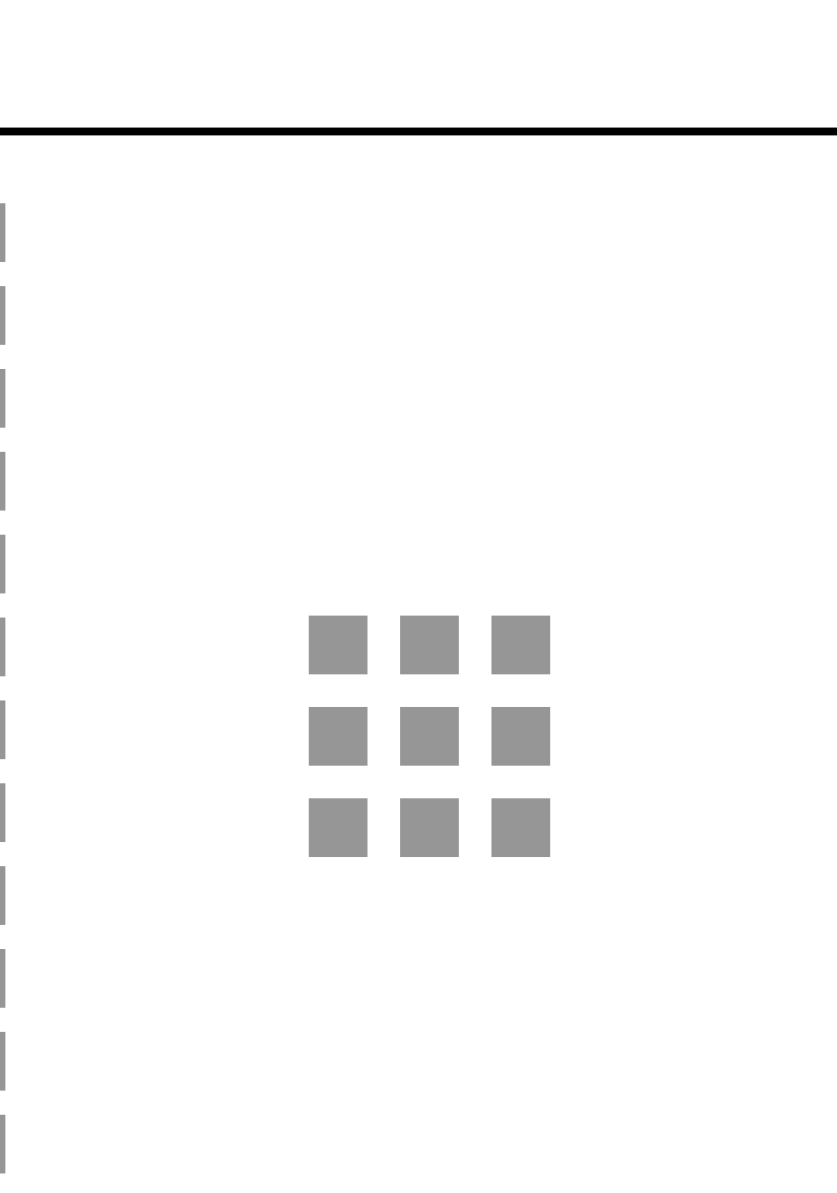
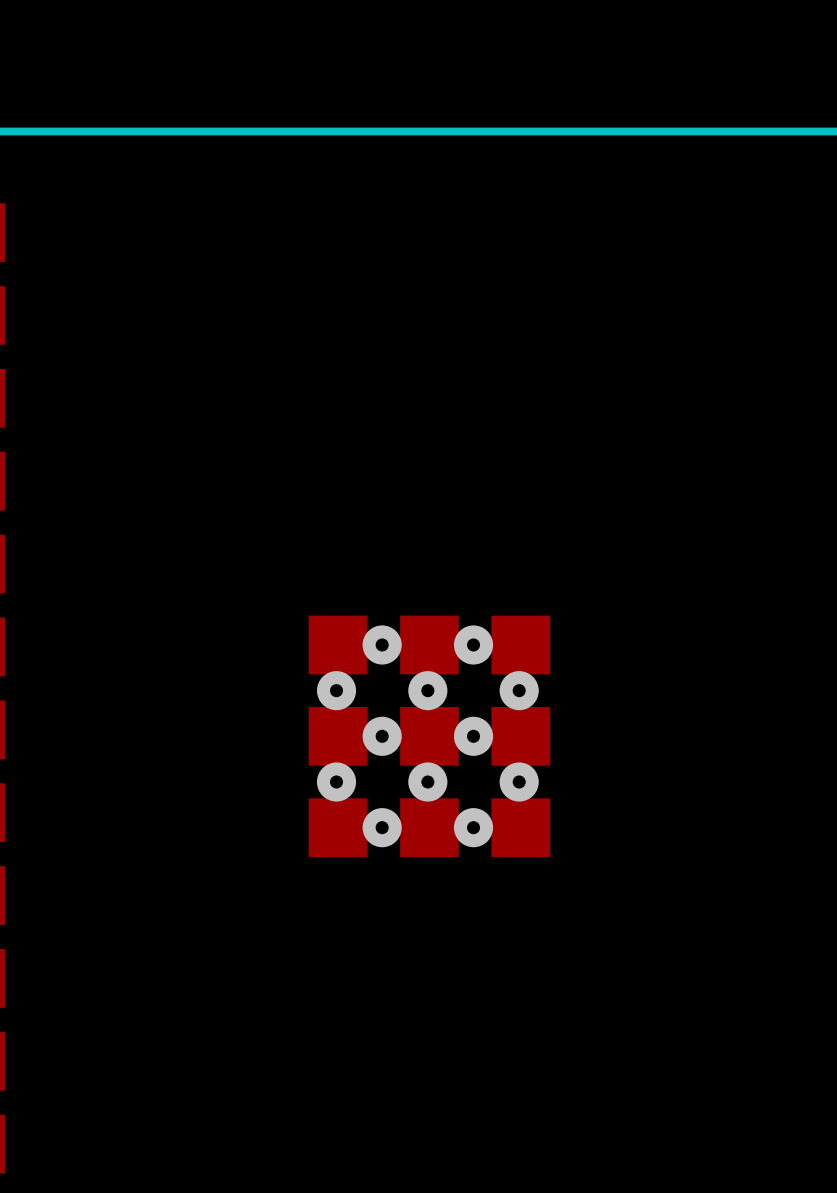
via: none -> (382, 644)
via: none -> (473, 644)
via: none -> (336, 690)
via: none -> (427, 690)
via: none -> (519, 690)
via: none -> (382, 736)
via: none -> (473, 736)
via: none -> (336, 781)
via: none -> (427, 781)
via: none -> (519, 781)
via: none -> (382, 827)
via: none -> (473, 827)

